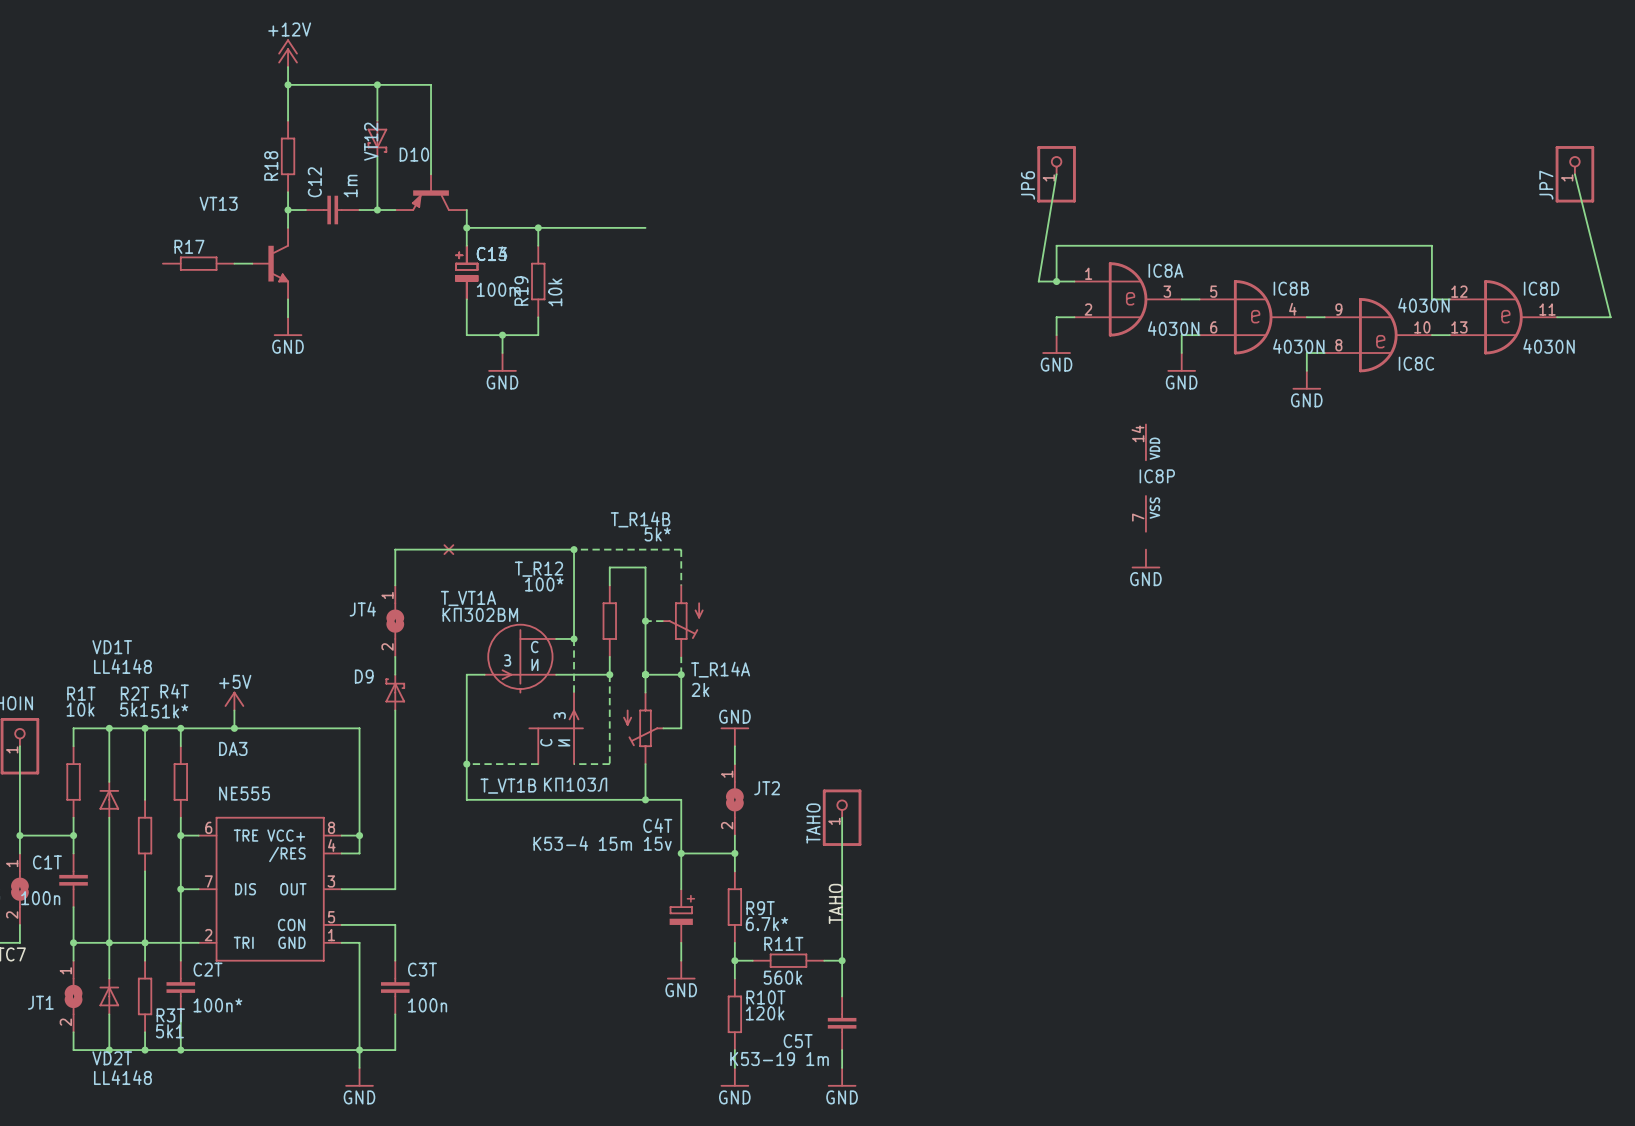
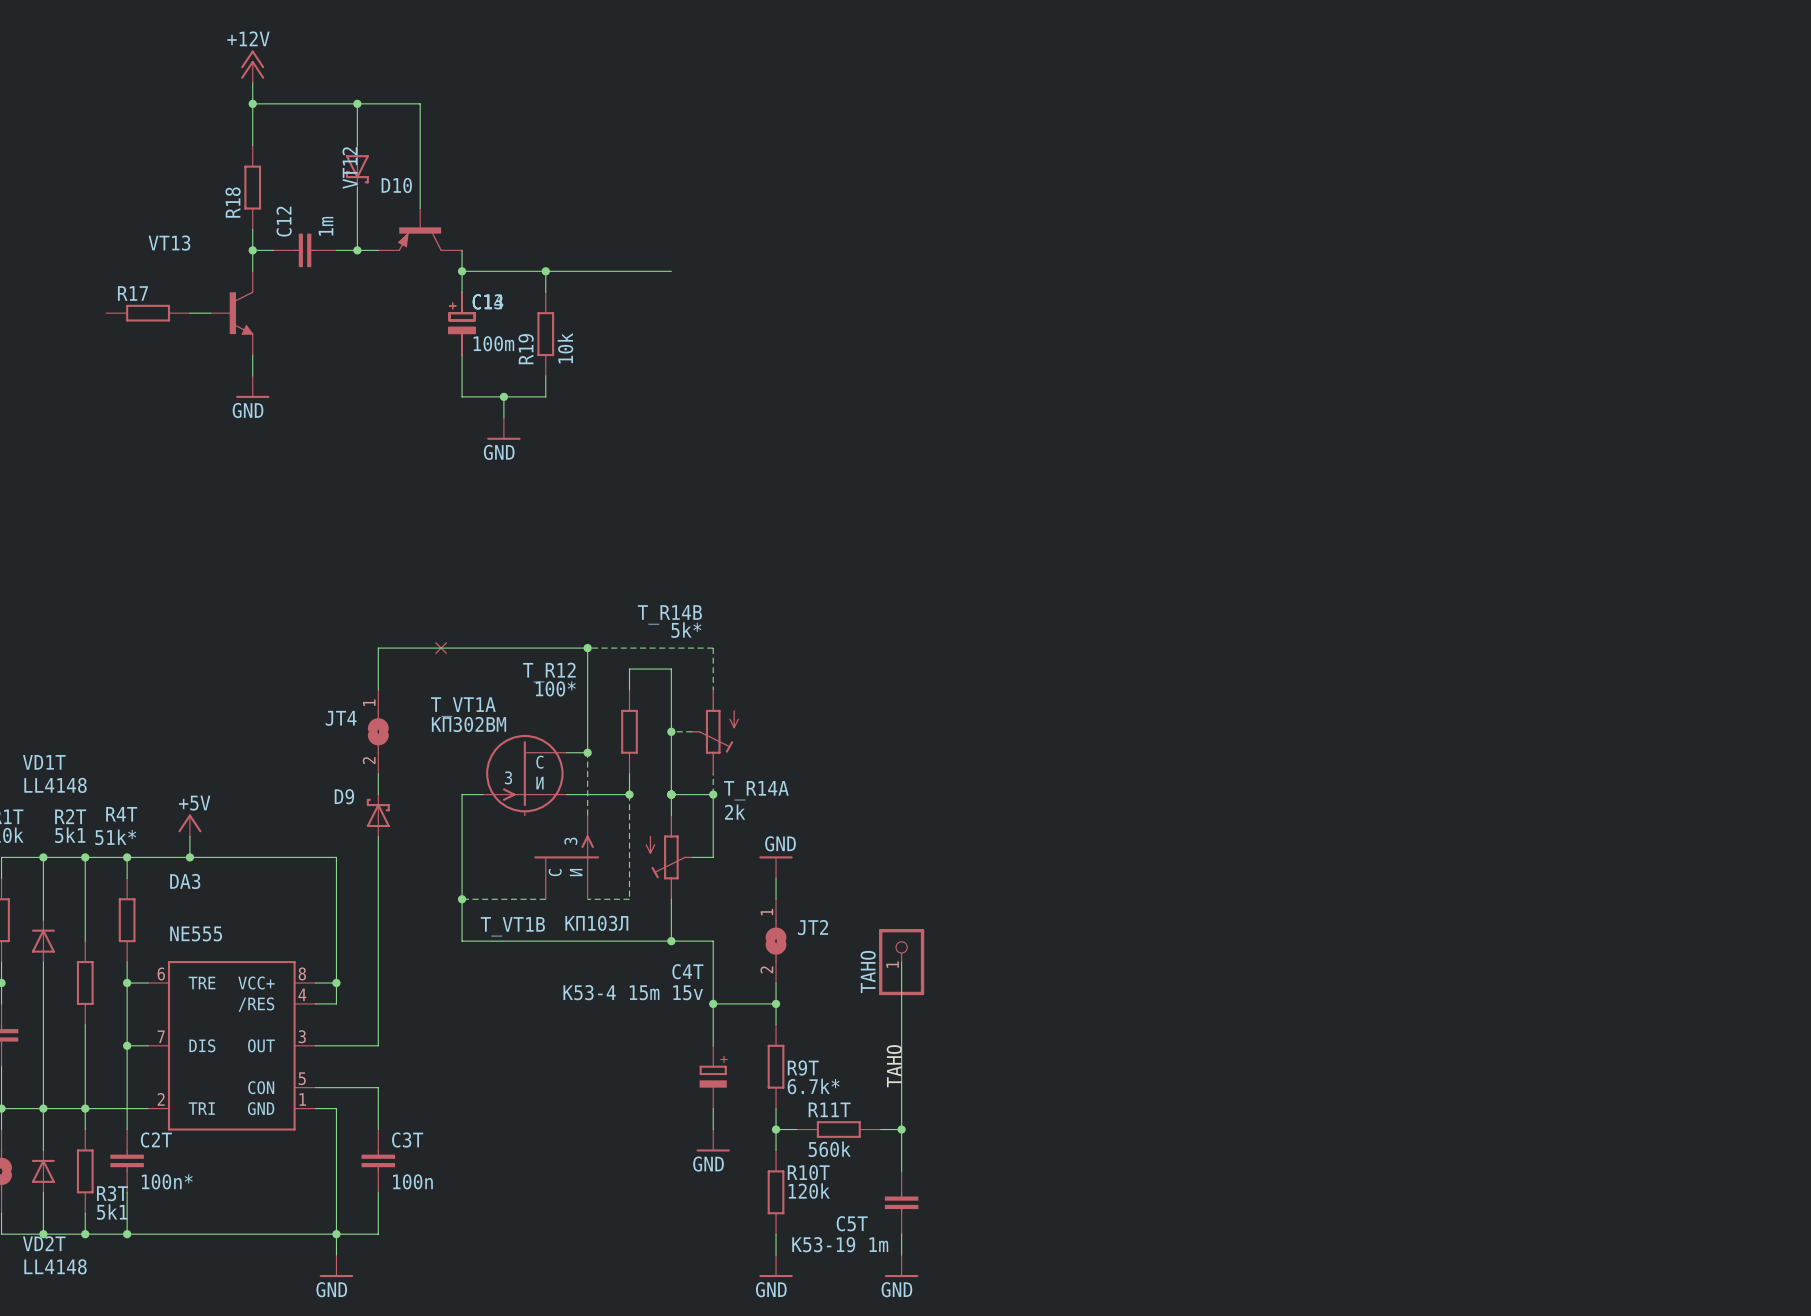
wire: (1056, 174) (1038, 281) (1074, 281) -> none
JP6: (1056, 174) -> none
wire: (1574, 174) (1610, 317) (1557, 317) -> none
JP7: (1574, 174) -> none
wire: (1056, 281) (1056, 245) (1431, 245) (1431, 299) (1449, 299) -> none
junction: (1056, 281) -> none
IC8A: 4030N (1128, 299) -> none
wire: (1181, 299) (1199, 299) -> none
wire: (1074, 317) (1056, 317) (1056, 335) -> none
IC8B: 4030N (1253, 317) -> none
wire: (1306, 317) (1324, 317) -> none
IC8D: 4030N (1503, 317) -> none
wire: (1199, 335) (1181, 335) (1181, 353) -> none
IC8C: 4030N (1378, 335) -> none
wire: (1431, 335) (1449, 335) -> none
power symbol: GND (1056, 344) -> none
wire: (1324, 353) (1306, 353) (1306, 370) -> none
power symbol: GND (1181, 362) -> none
power symbol: GND (1306, 380) -> none
IC8P: (1145, 478) -> none
power symbol: GND (1145, 559) -> none

